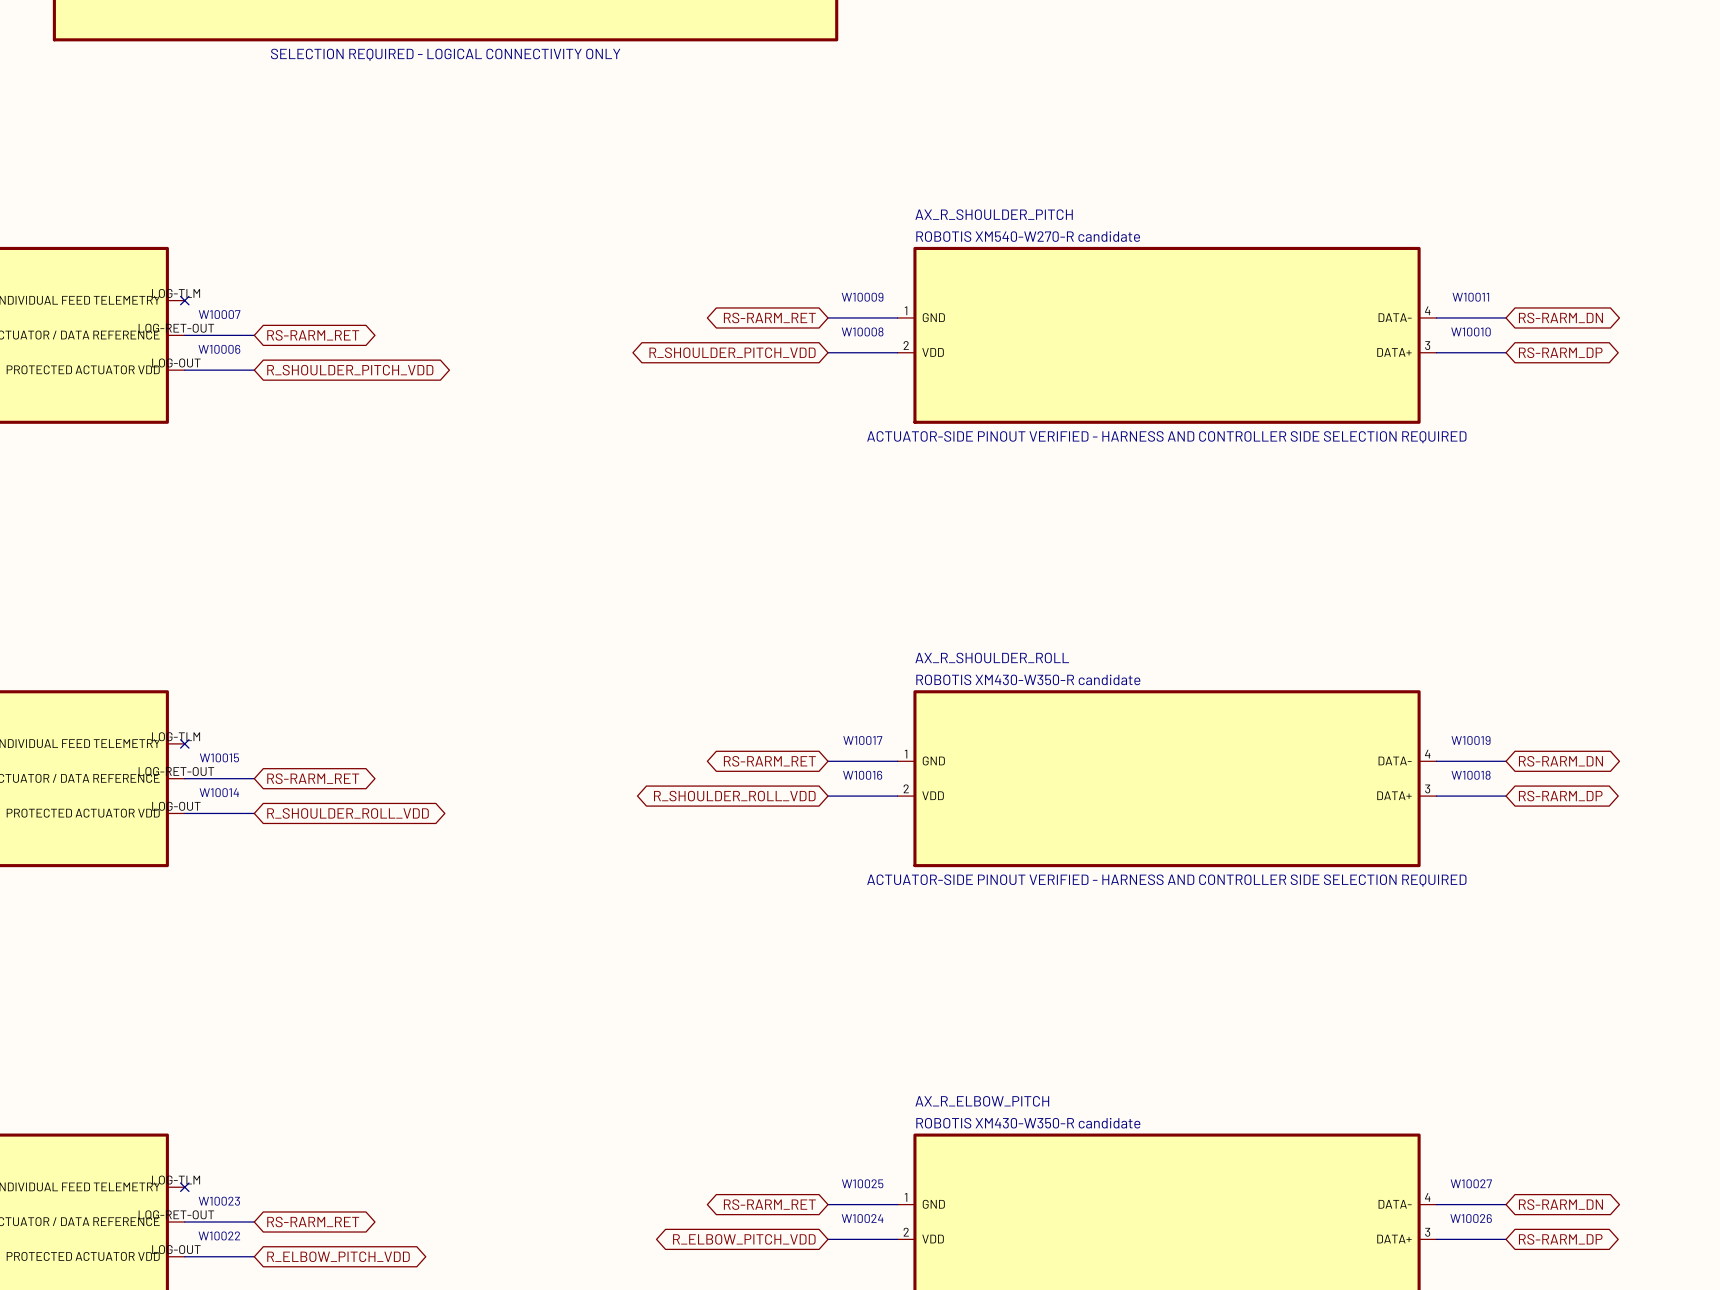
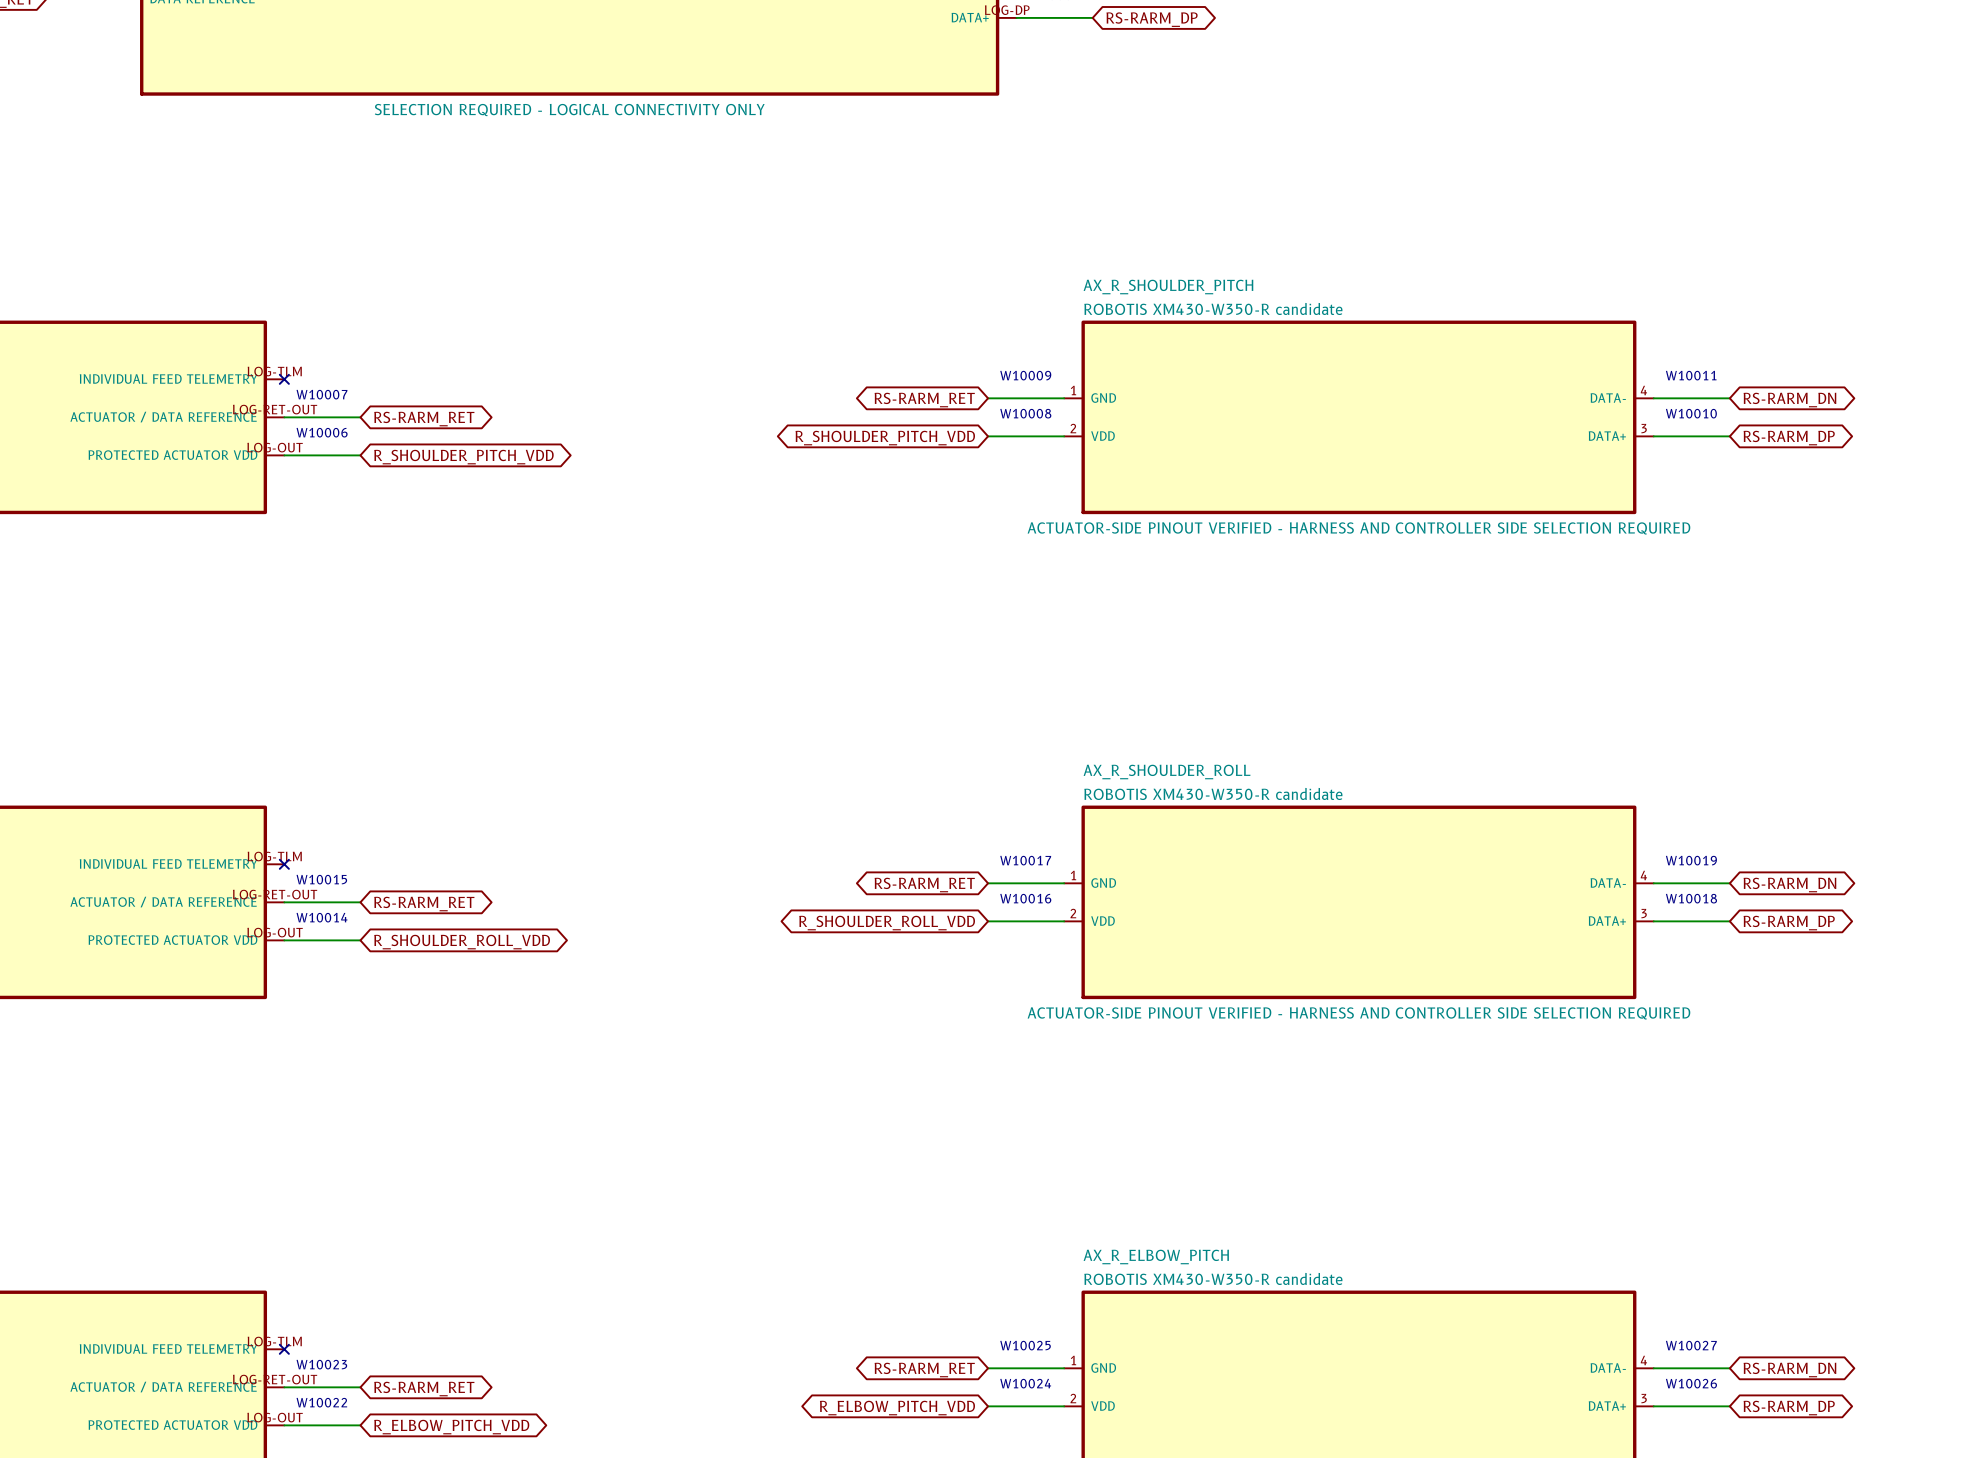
AX_R_SHOULDER_PITCH text: ROBOTIS XM540-W270-R candidate (1028, 236) -> ROBOTIS XM430-W350-R candidate (1213, 308)

